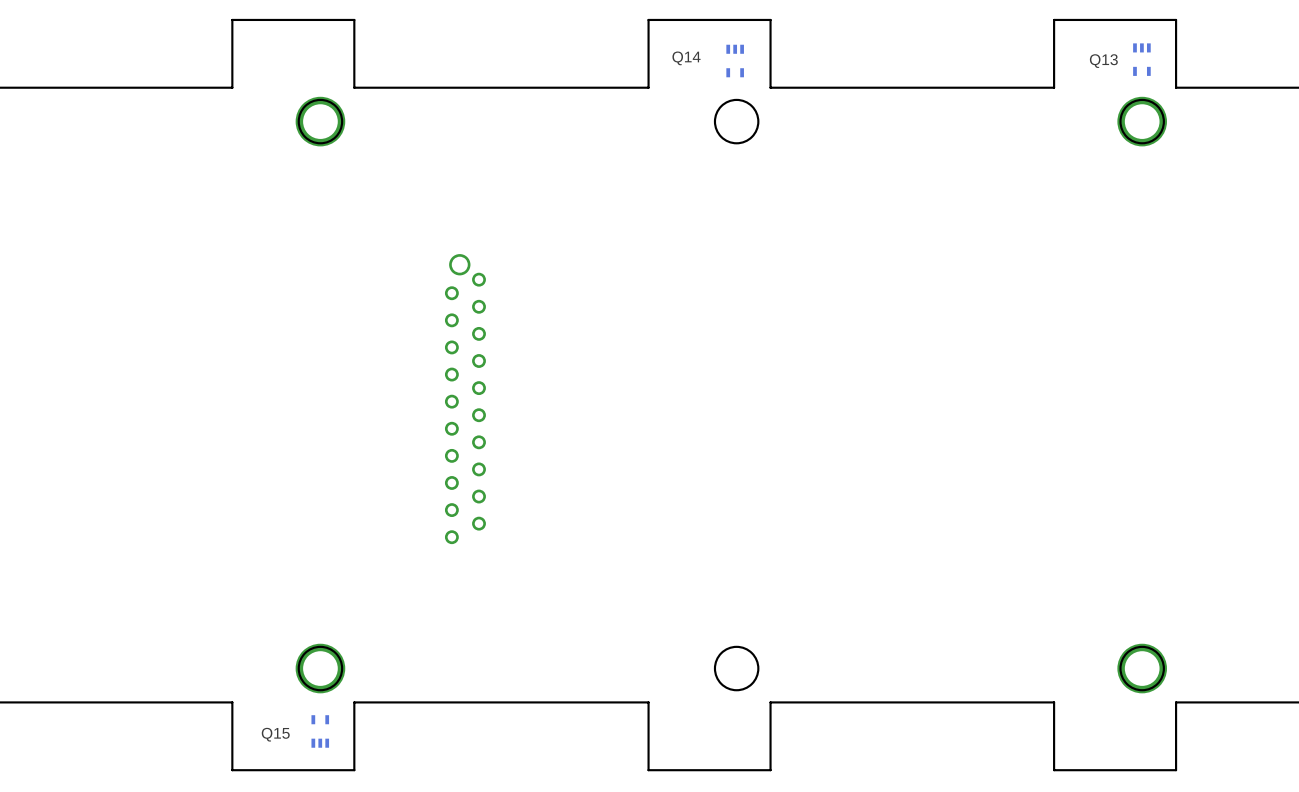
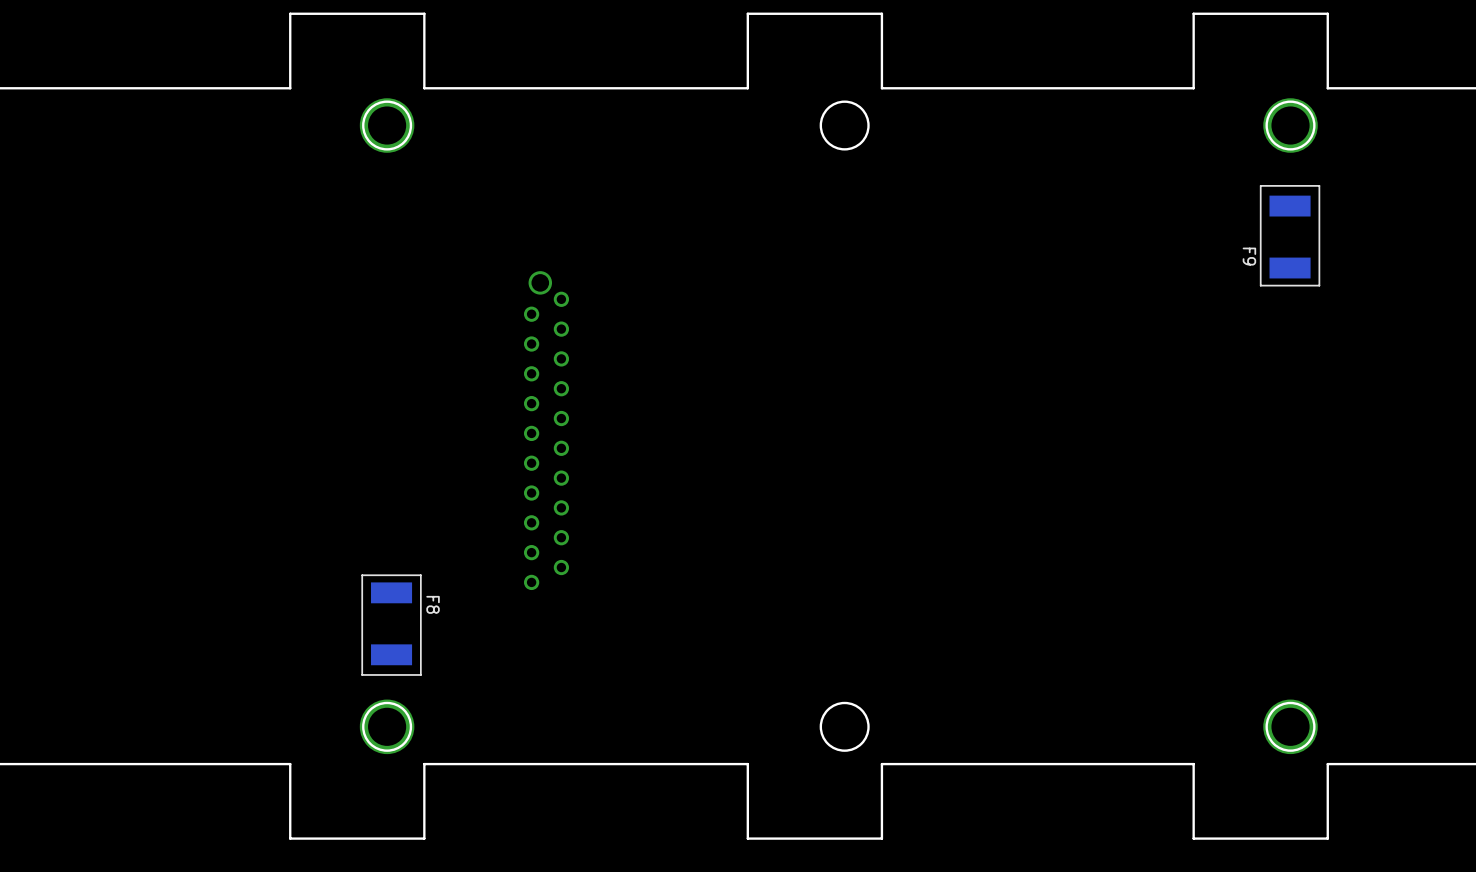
Q13: (1141, 59) -> none
Q14: (735, 61) -> none
F9: none -> (1290, 235)
F8: none -> (391, 625)
Q15: (320, 731) -> none

